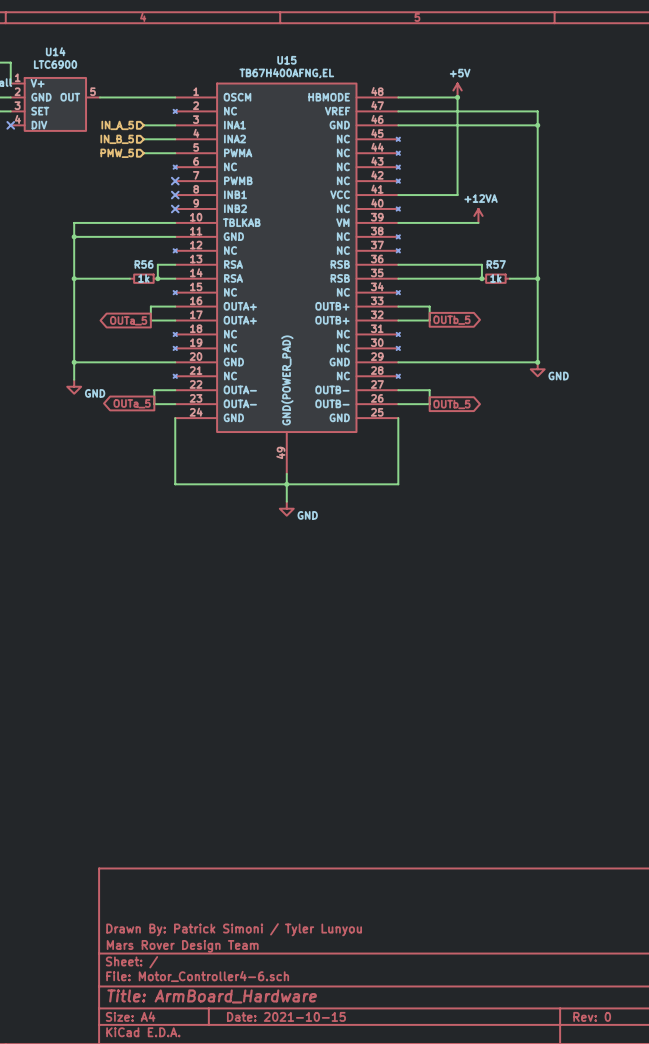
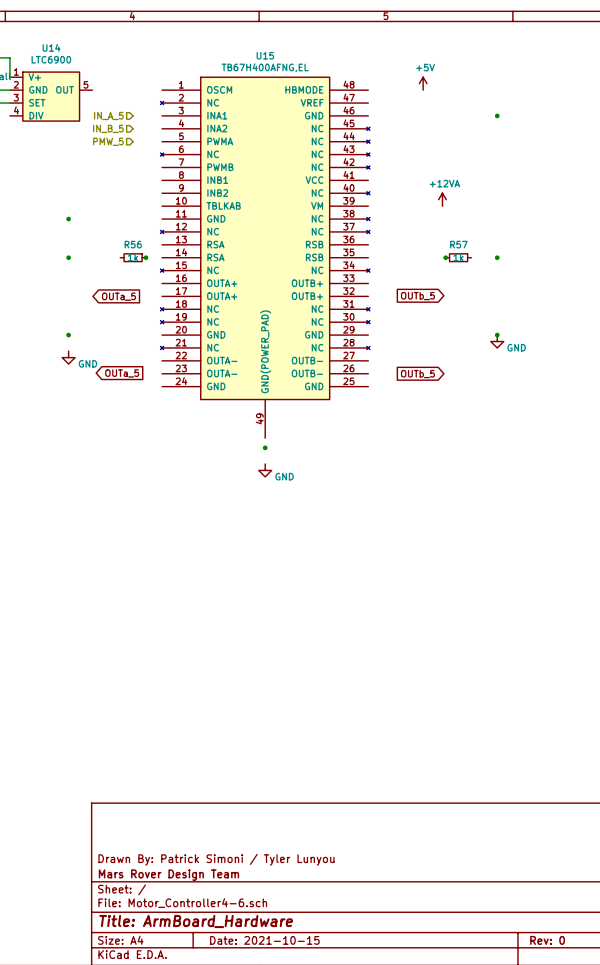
wire: (99, 97) (175, 97) -> none
wire: (398, 97) (457, 97) (457, 195) (398, 195) -> none
junction: (457, 97) -> none
wire: (398, 111) (537, 111) (537, 362) (398, 362) -> none
no-connect mark: (10, 125) -> none
wire: (143, 125) (175, 125) -> none
wire: (398, 125) (537, 125) -> none
wire: (143, 139) (175, 139) -> none
wire: (143, 153) (175, 153) -> none
no-connect mark: (175, 181) -> none
no-connect mark: (175, 195) -> none
no-connect mark: (175, 208) -> none
wire: (175, 222) (74, 222) (74, 379) -> none
wire: (398, 222) (478, 222) -> none
wire: (74, 236) (175, 236) -> none
wire: (175, 264) (157, 264) (157, 278) (175, 278) -> none
wire: (398, 264) (481, 264) (481, 278) (398, 278) -> none
wire: (74, 278) (129, 278) -> none
wire: (509, 278) (537, 278) -> none
wire: (175, 306) (150, 306) (150, 320) (175, 320) -> none
wire: (398, 306) (429, 306) (429, 320) (398, 320) -> none
wire: (74, 362) (175, 362) -> none
wire: (175, 390) (154, 390) (154, 404) (175, 404) -> none
wire: (398, 390) (429, 390) (429, 404) (398, 404) -> none
wire: (175, 418) (175, 484) (398, 484) (398, 418) -> none
wire: (286, 473) (286, 501) -> none

